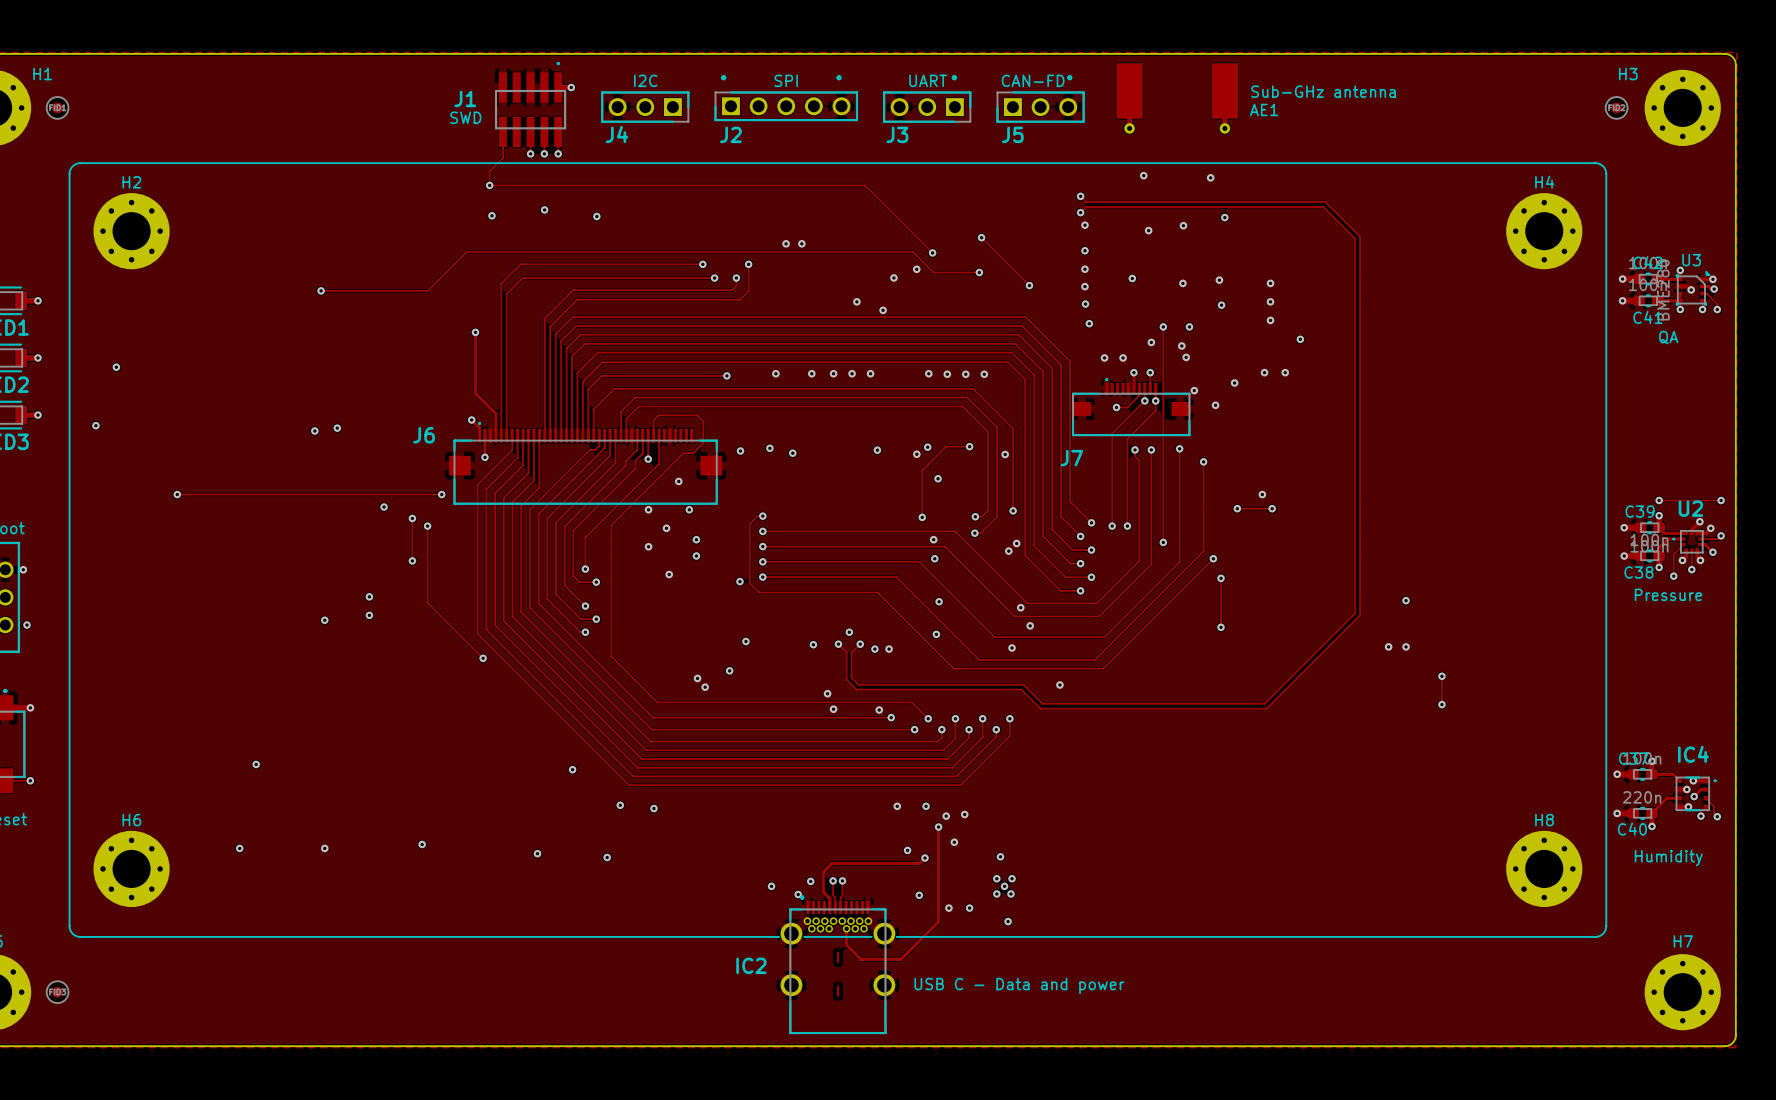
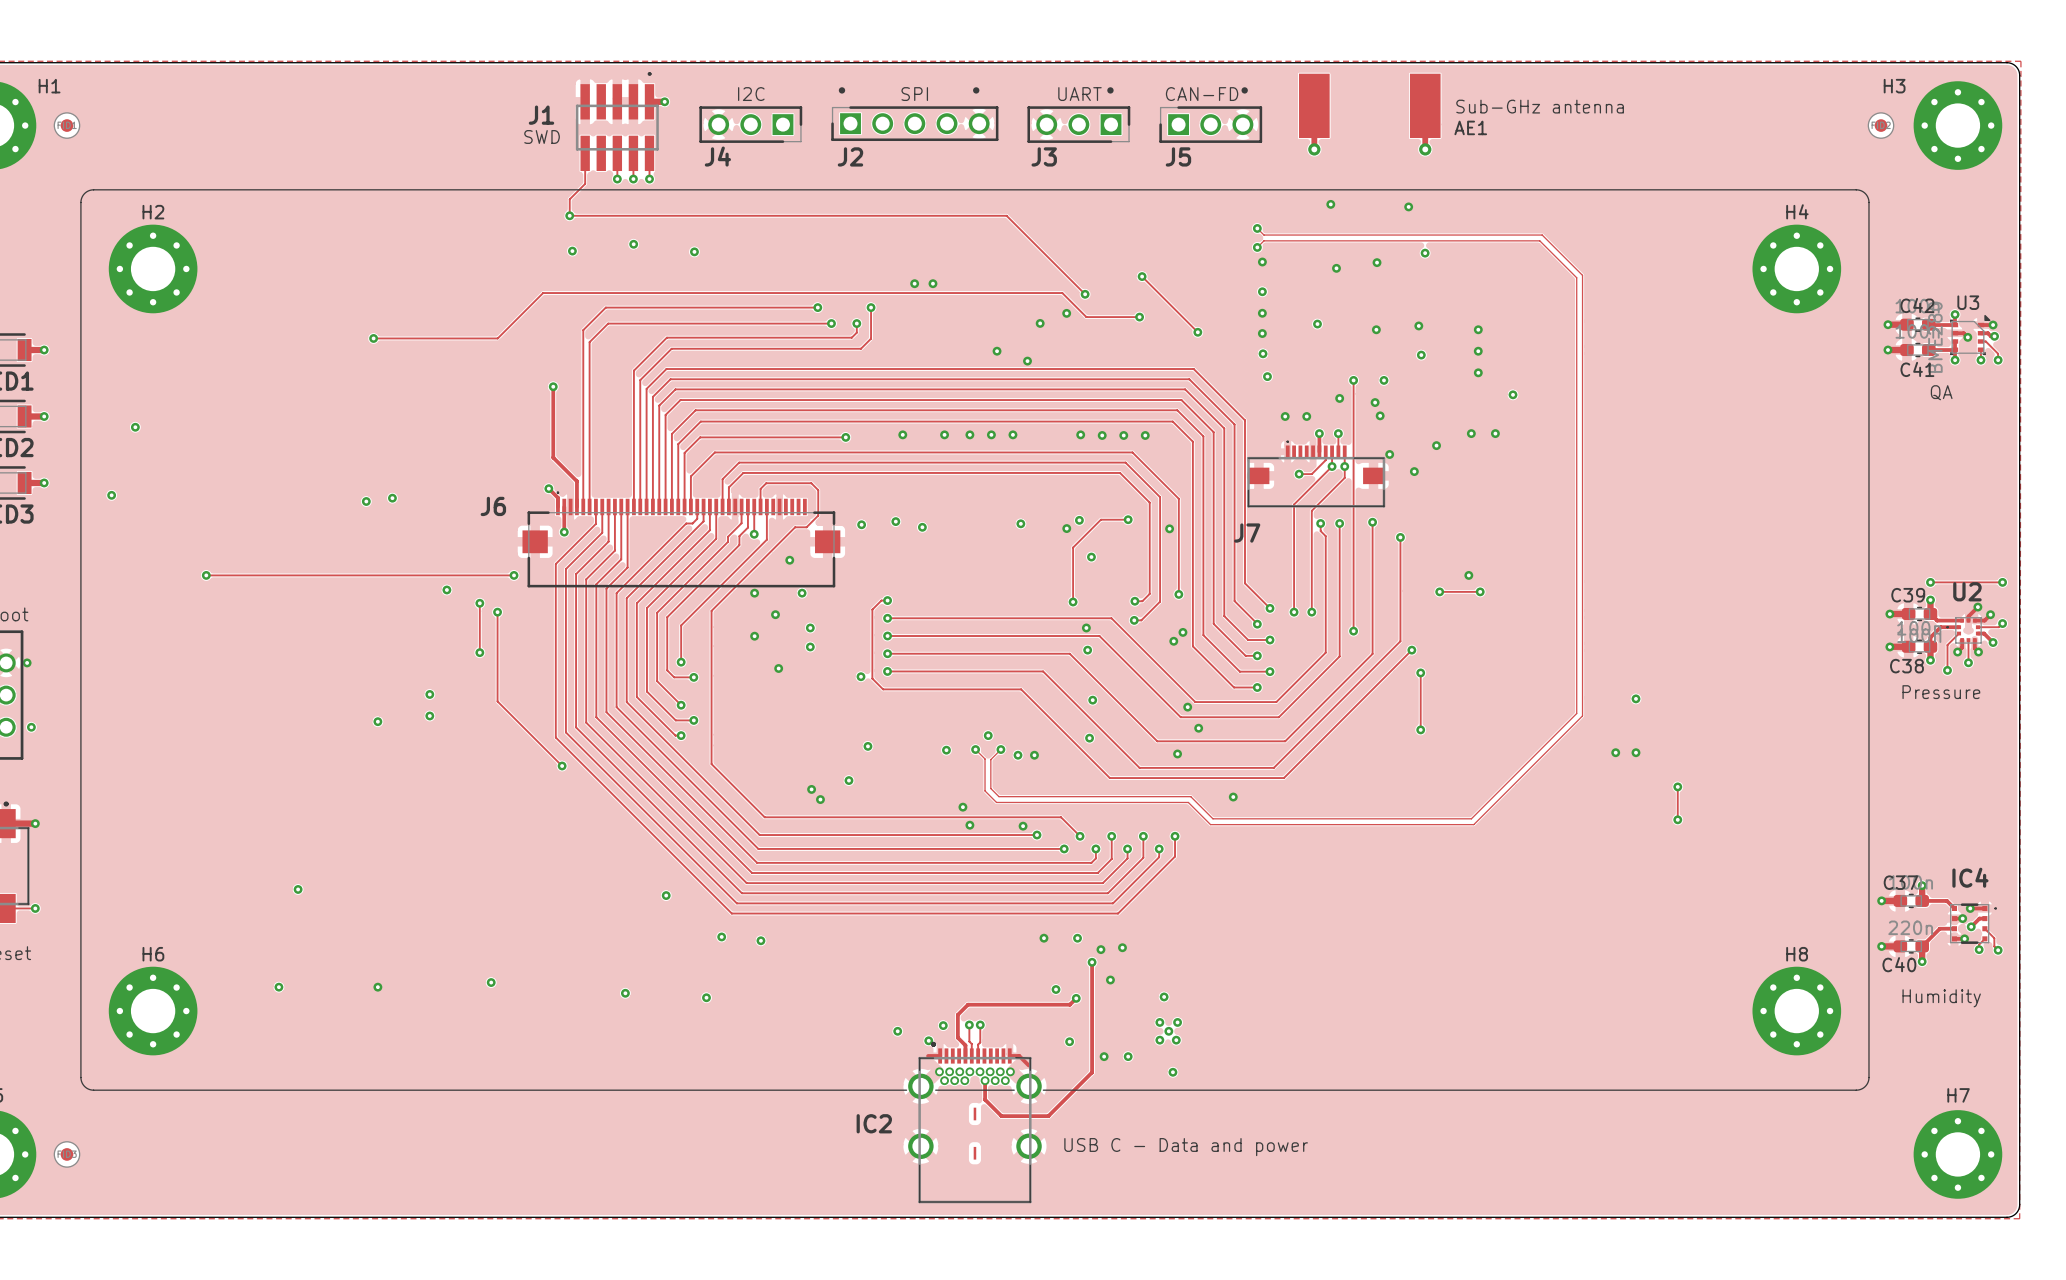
track: none -> (928, 1055) (940, 1055)
track: none -> (1009, 1055) (1019, 1055) (1028, 1065)

